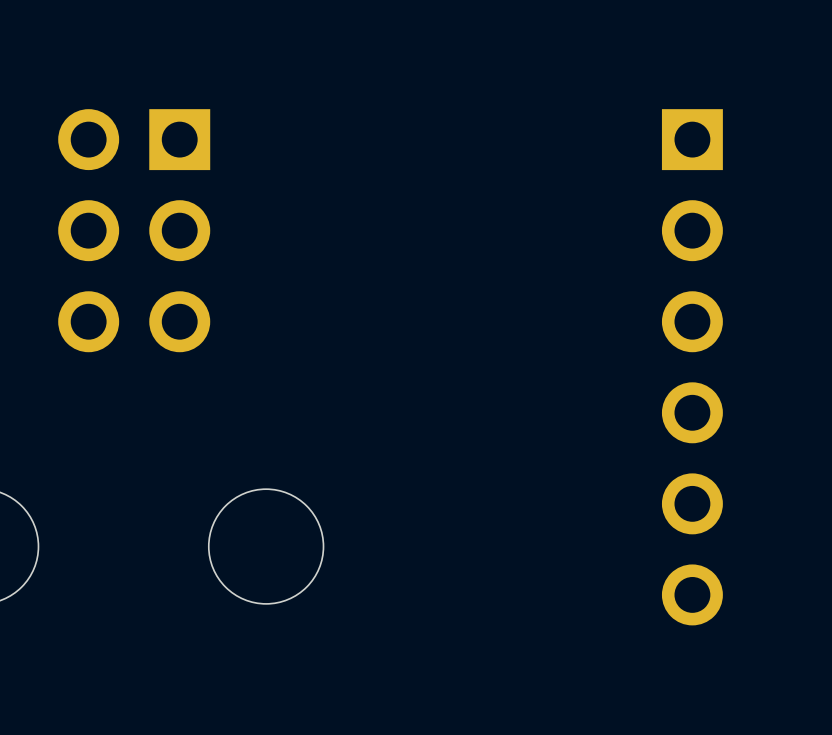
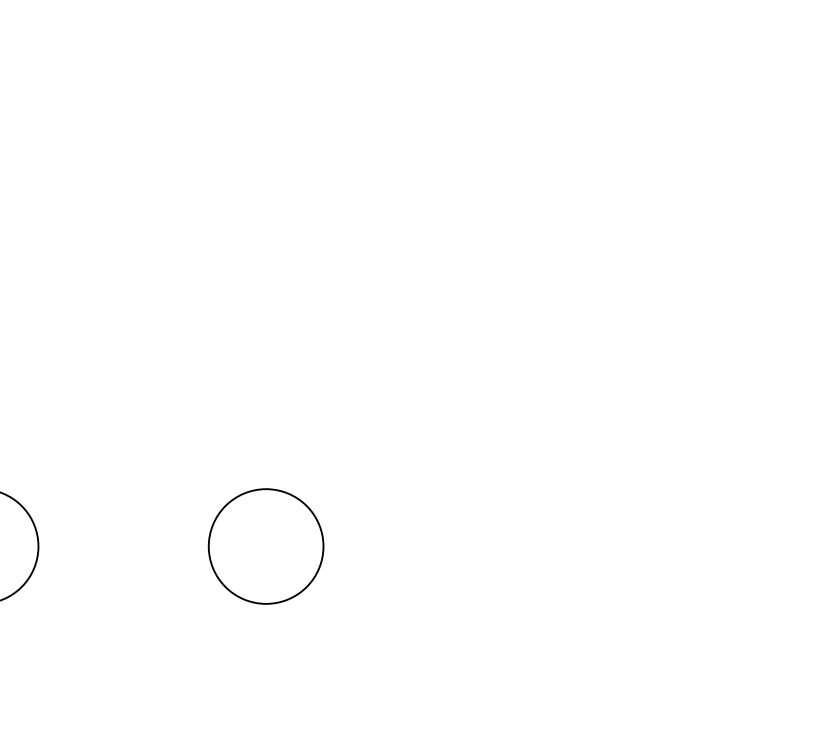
part: (134, 230) -> none
part: (692, 367) -> none

